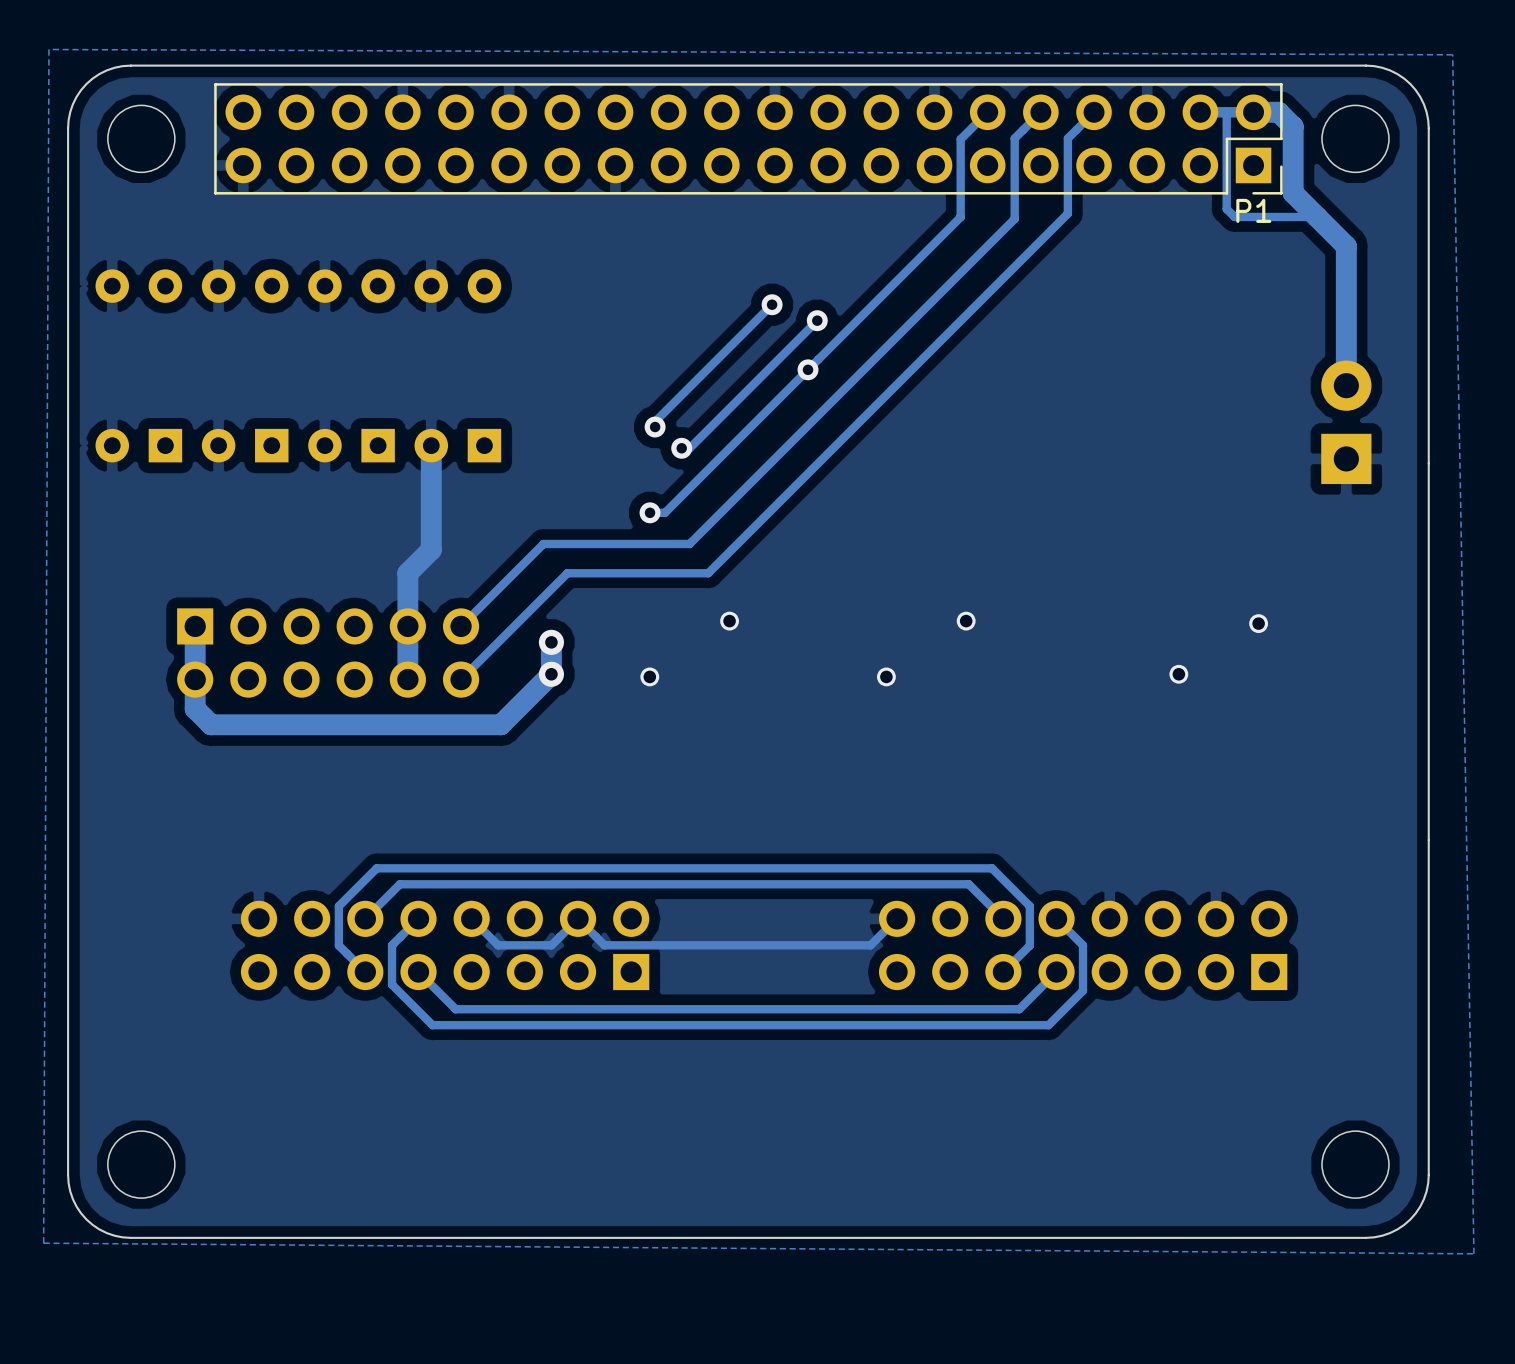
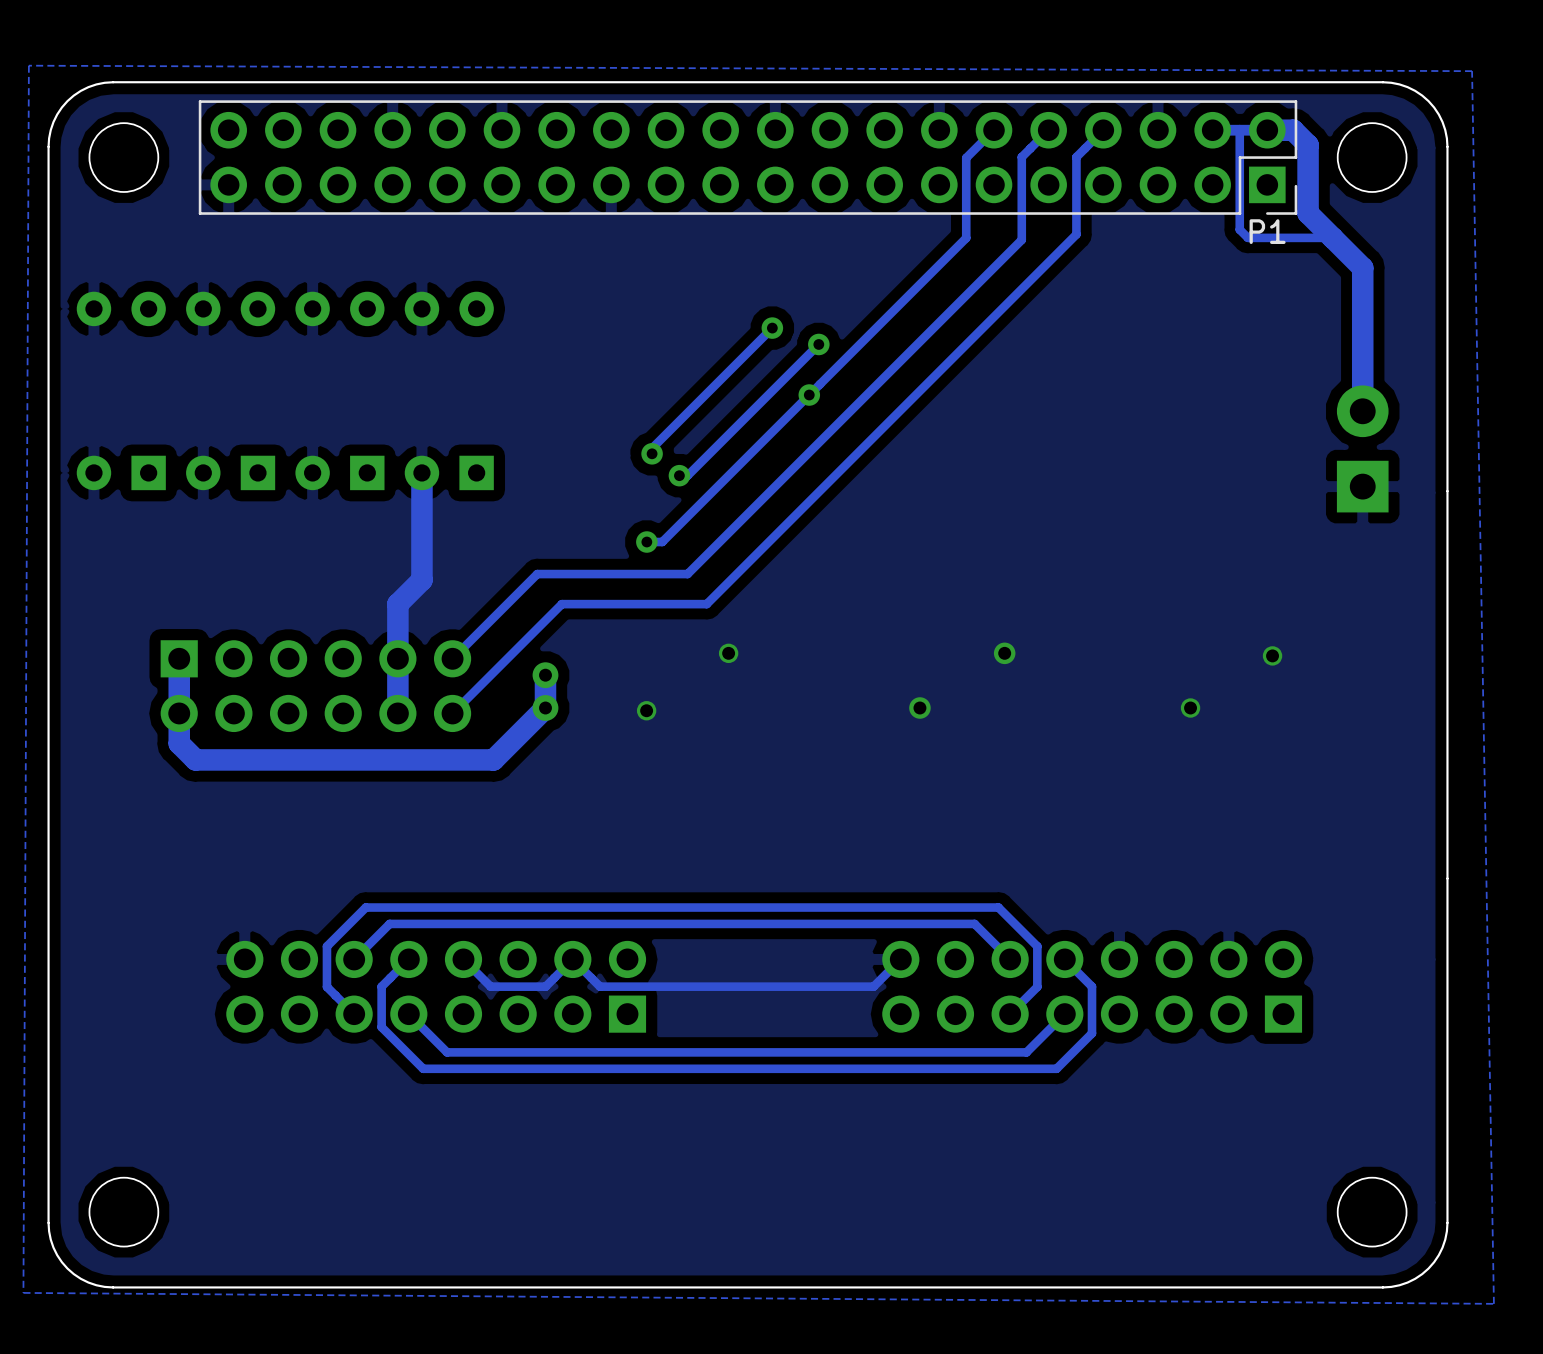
via: (966, 621) -> none
via: none -> (1004, 653)
via: none -> (919, 708)
via: (886, 676) -> none

